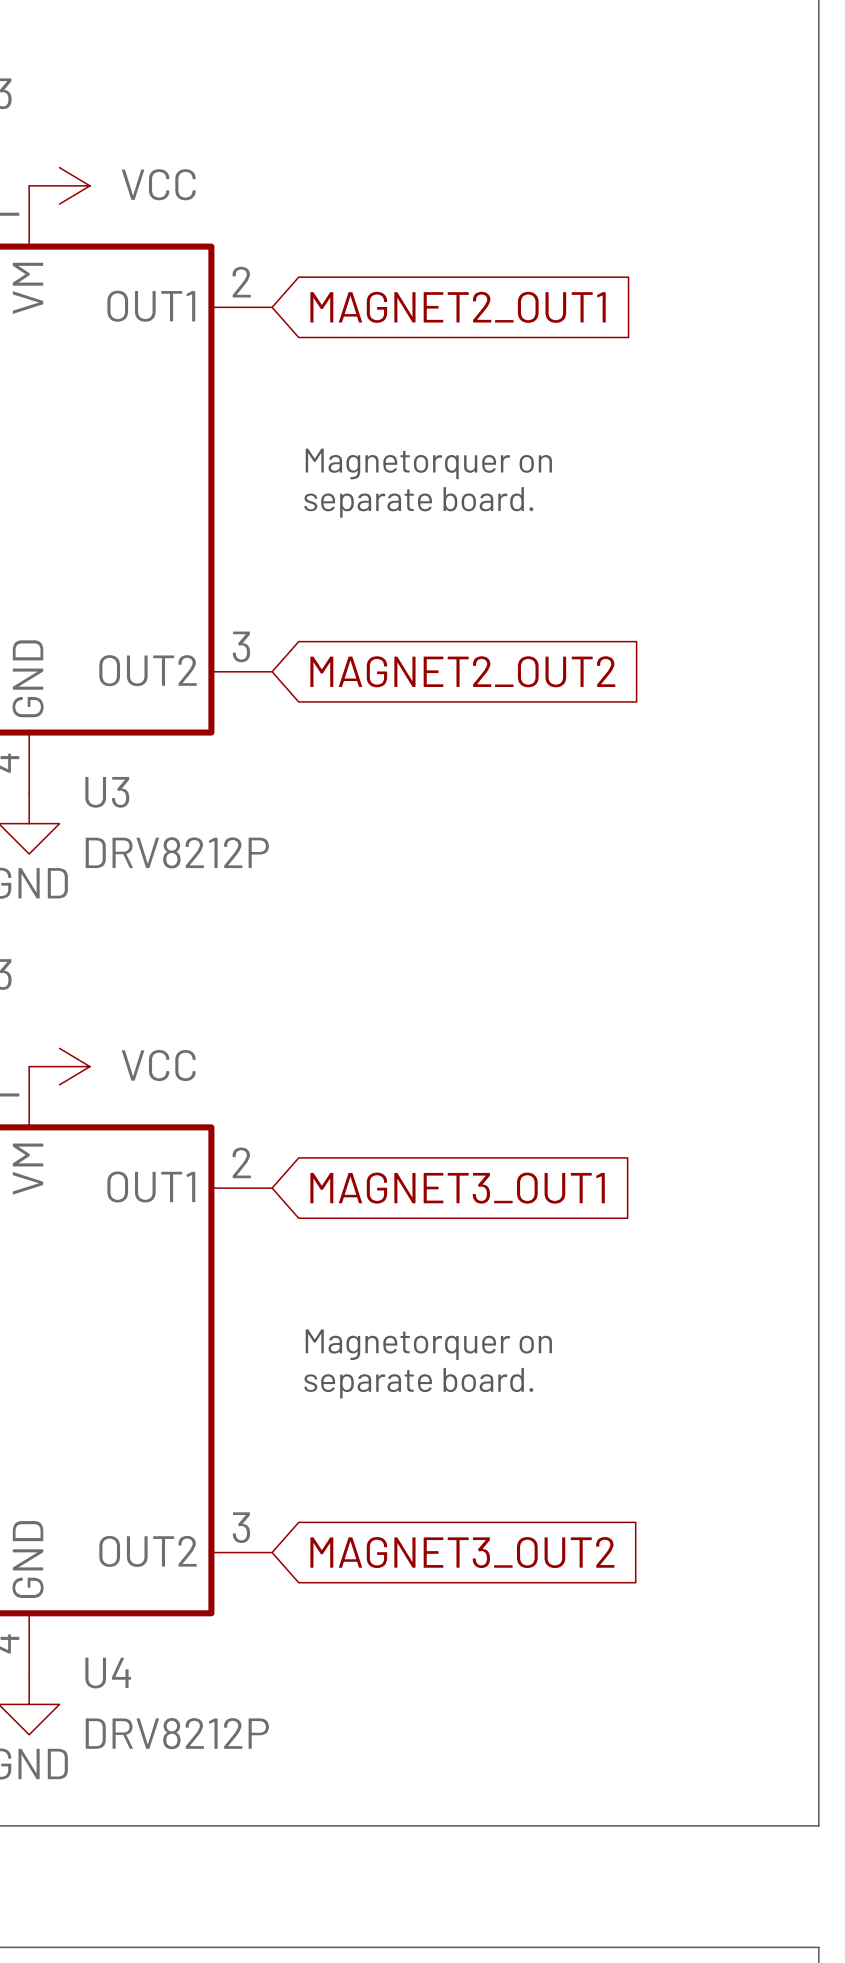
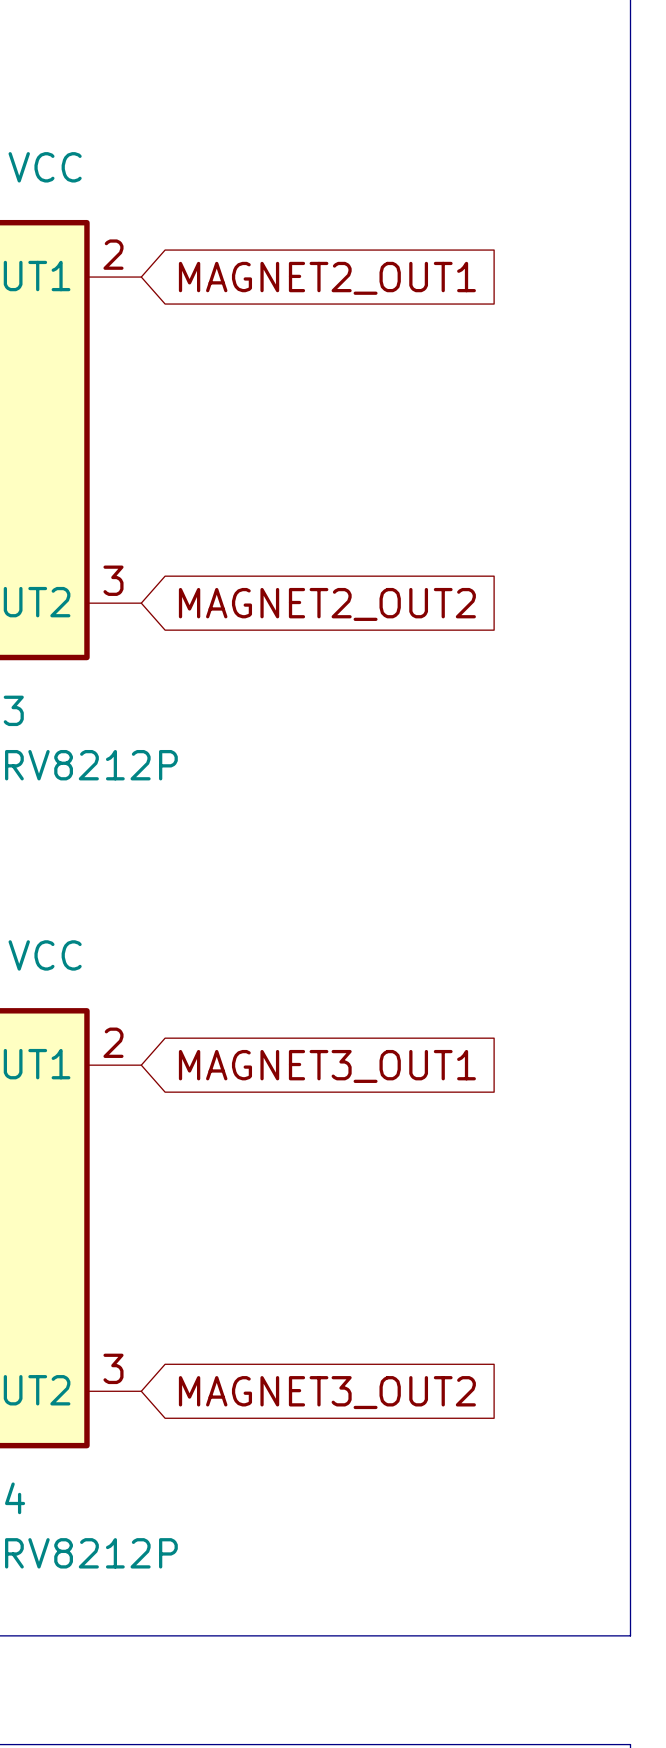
text: Magnetorquer on (428, 463) -> none
text: separate board. (418, 502) -> none
text: Magnetorquer on (428, 1344) -> none
text: separate board. (418, 1383) -> none

